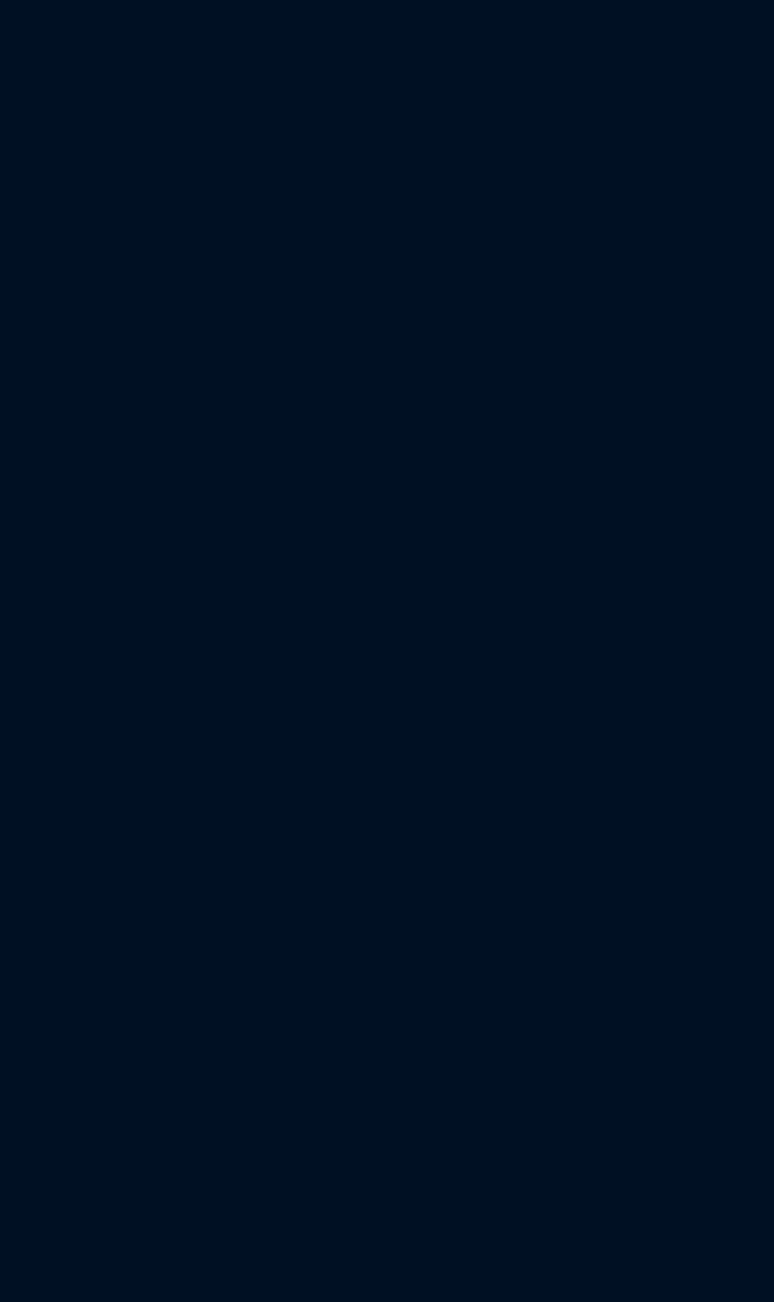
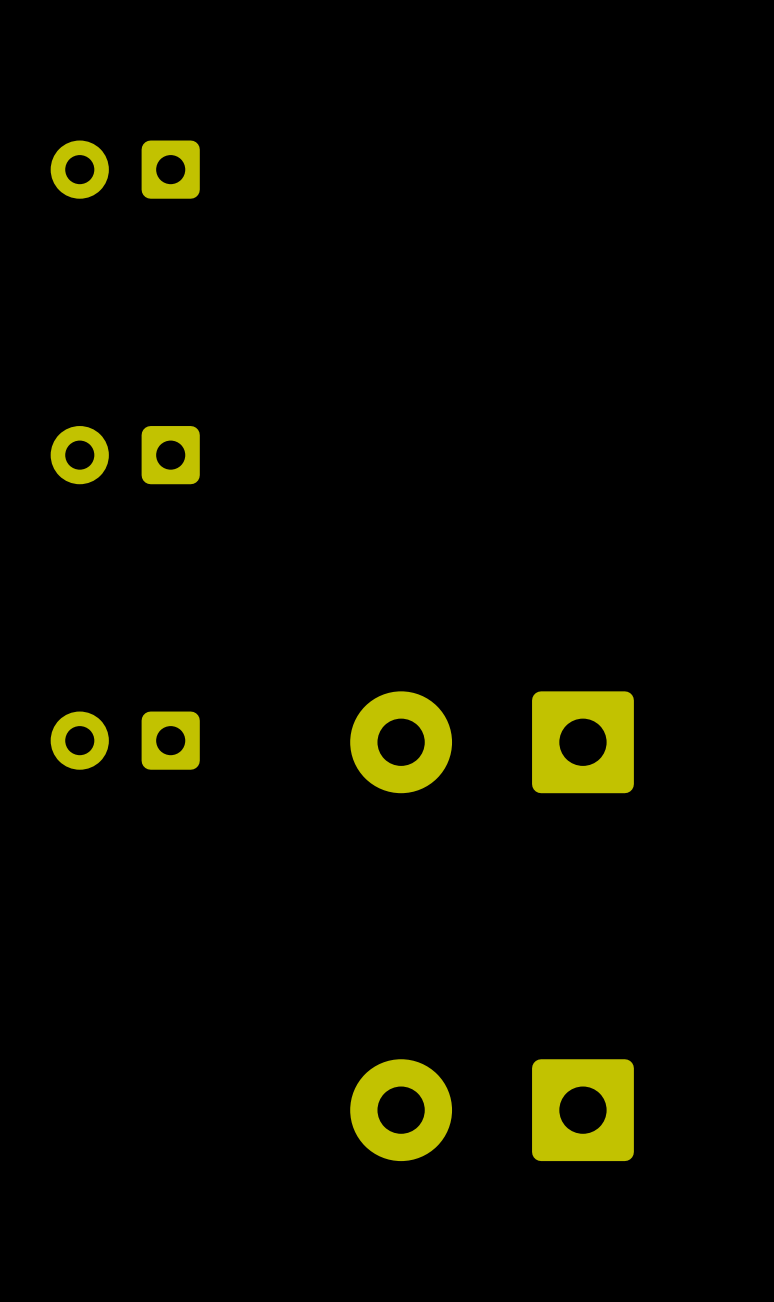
part: none -> (125, 169)
part: none -> (125, 455)
part: none -> (125, 740)
part: none -> (492, 742)
part: none -> (492, 1110)

